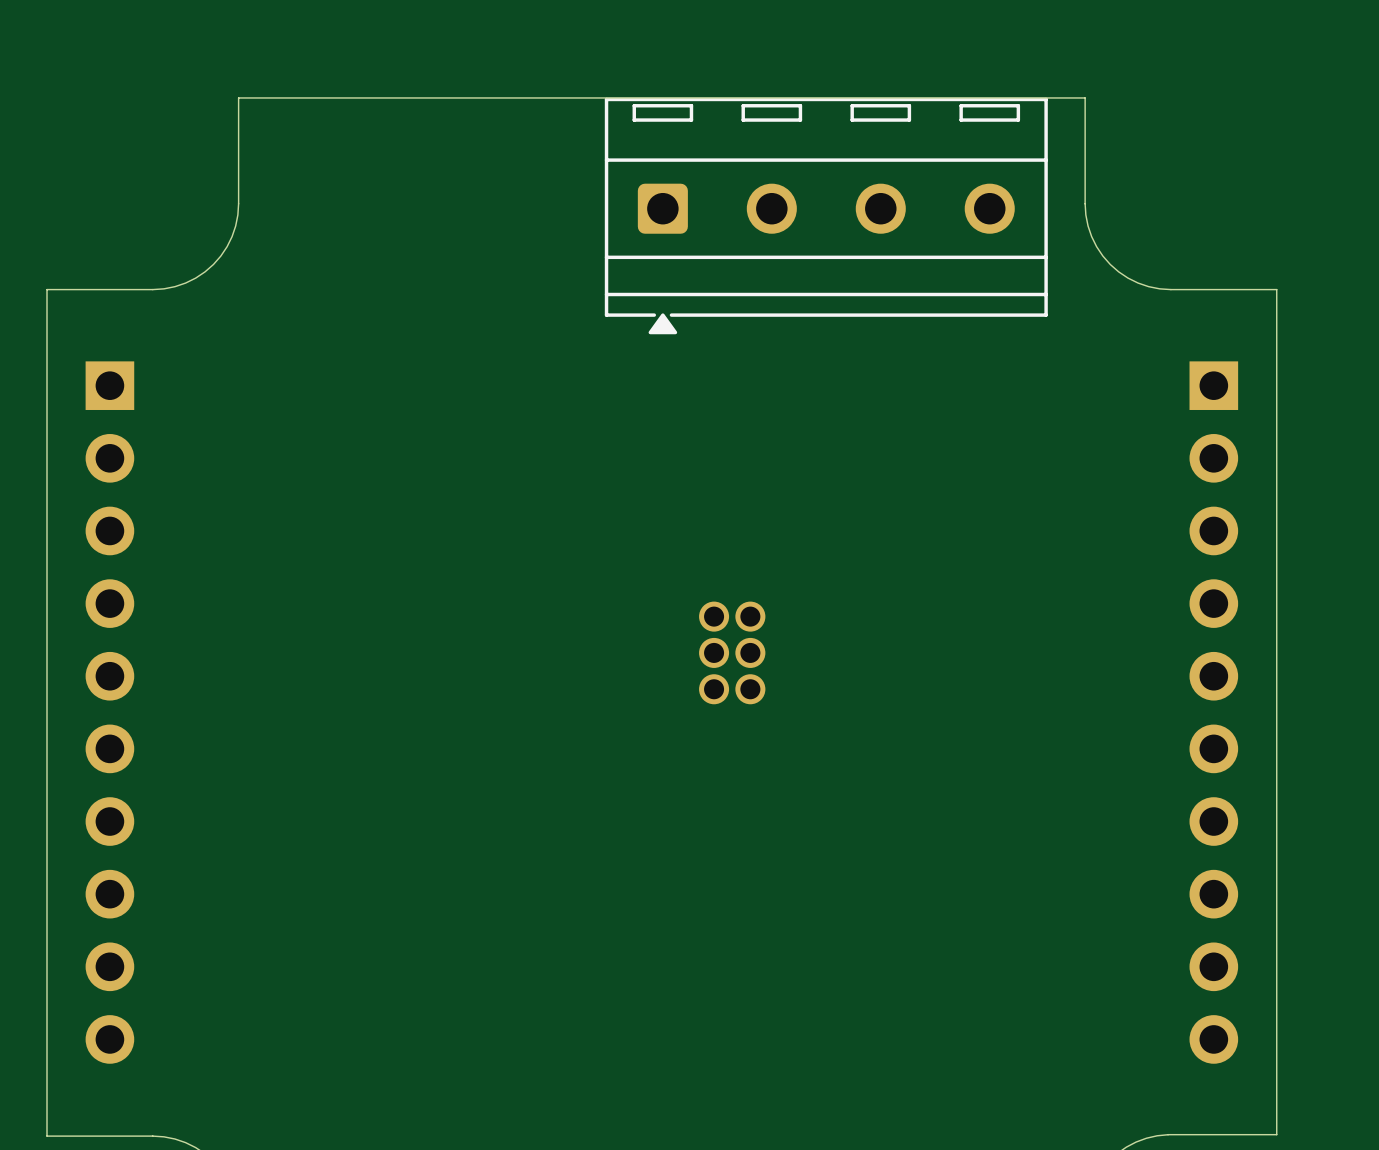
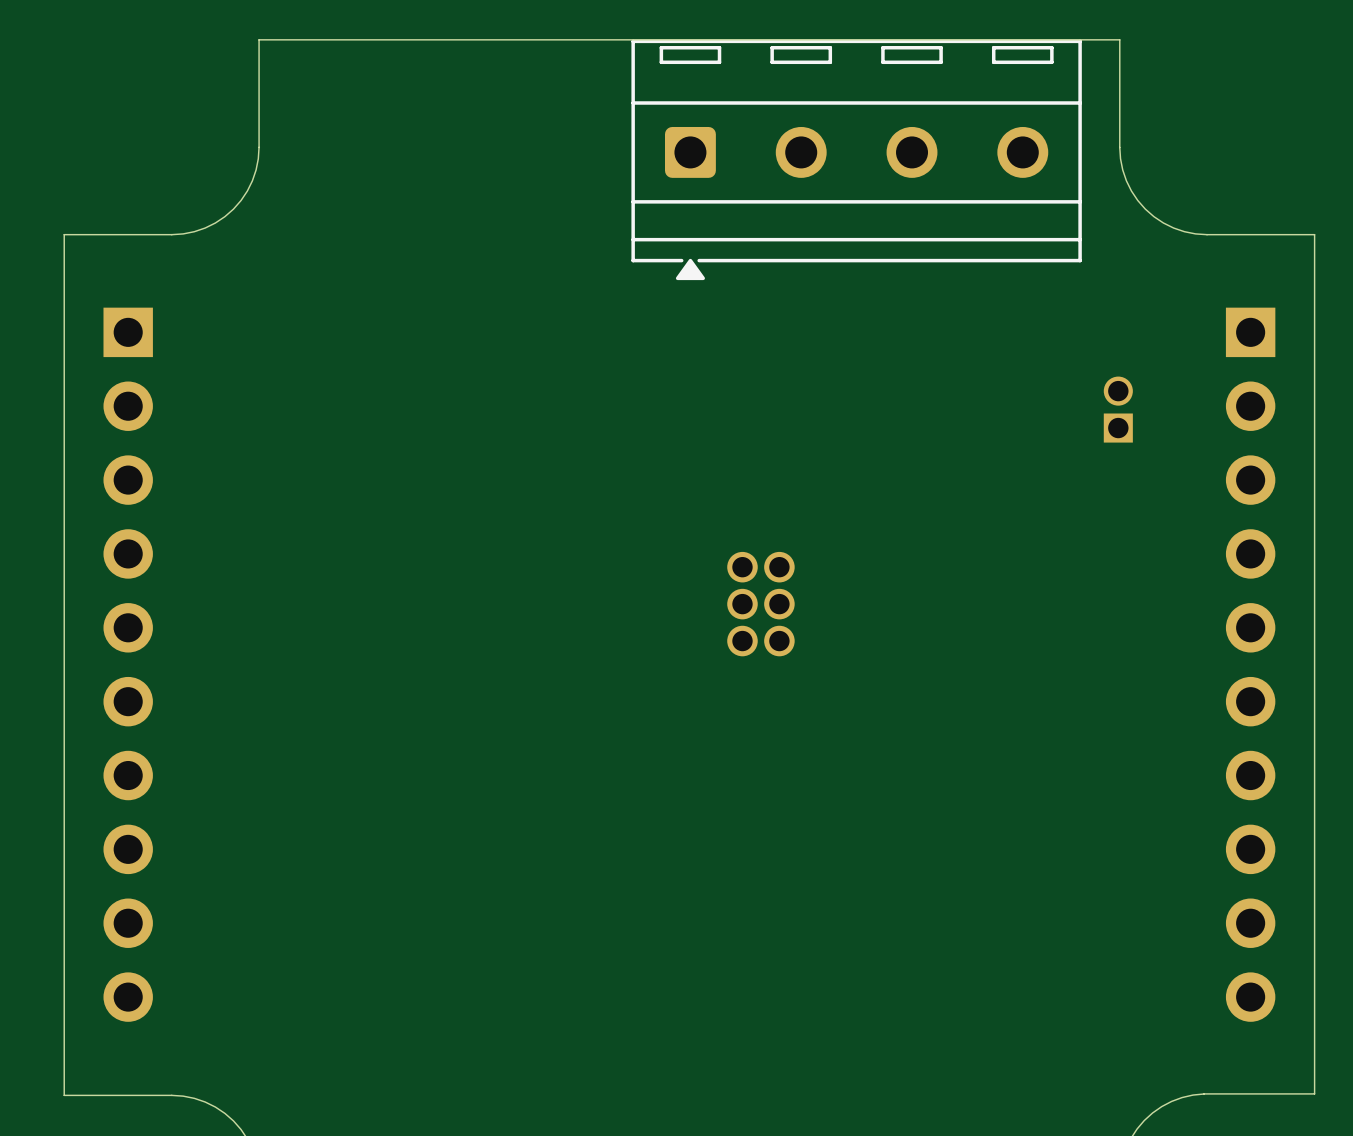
part: none -> (1118, 409)

